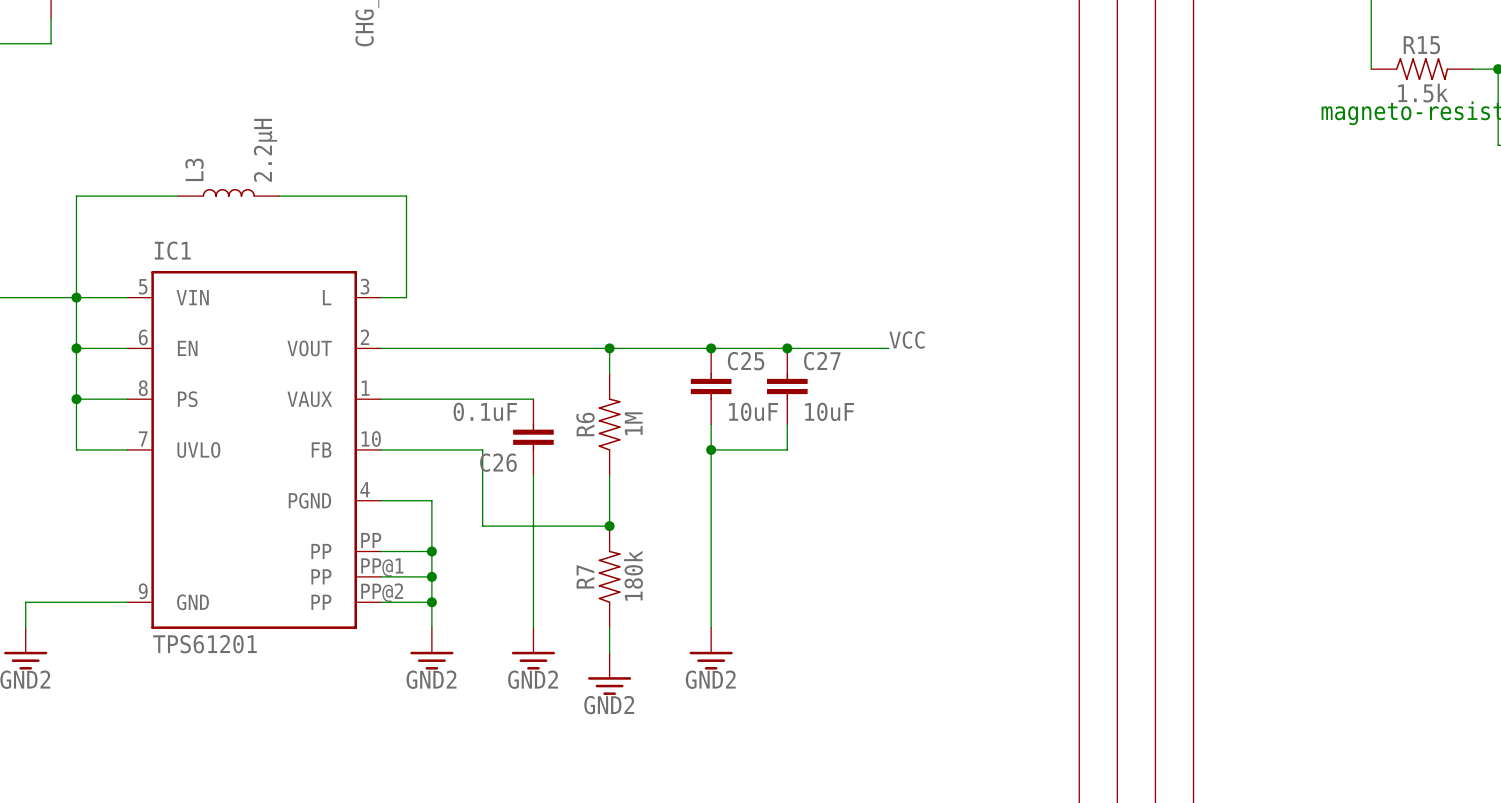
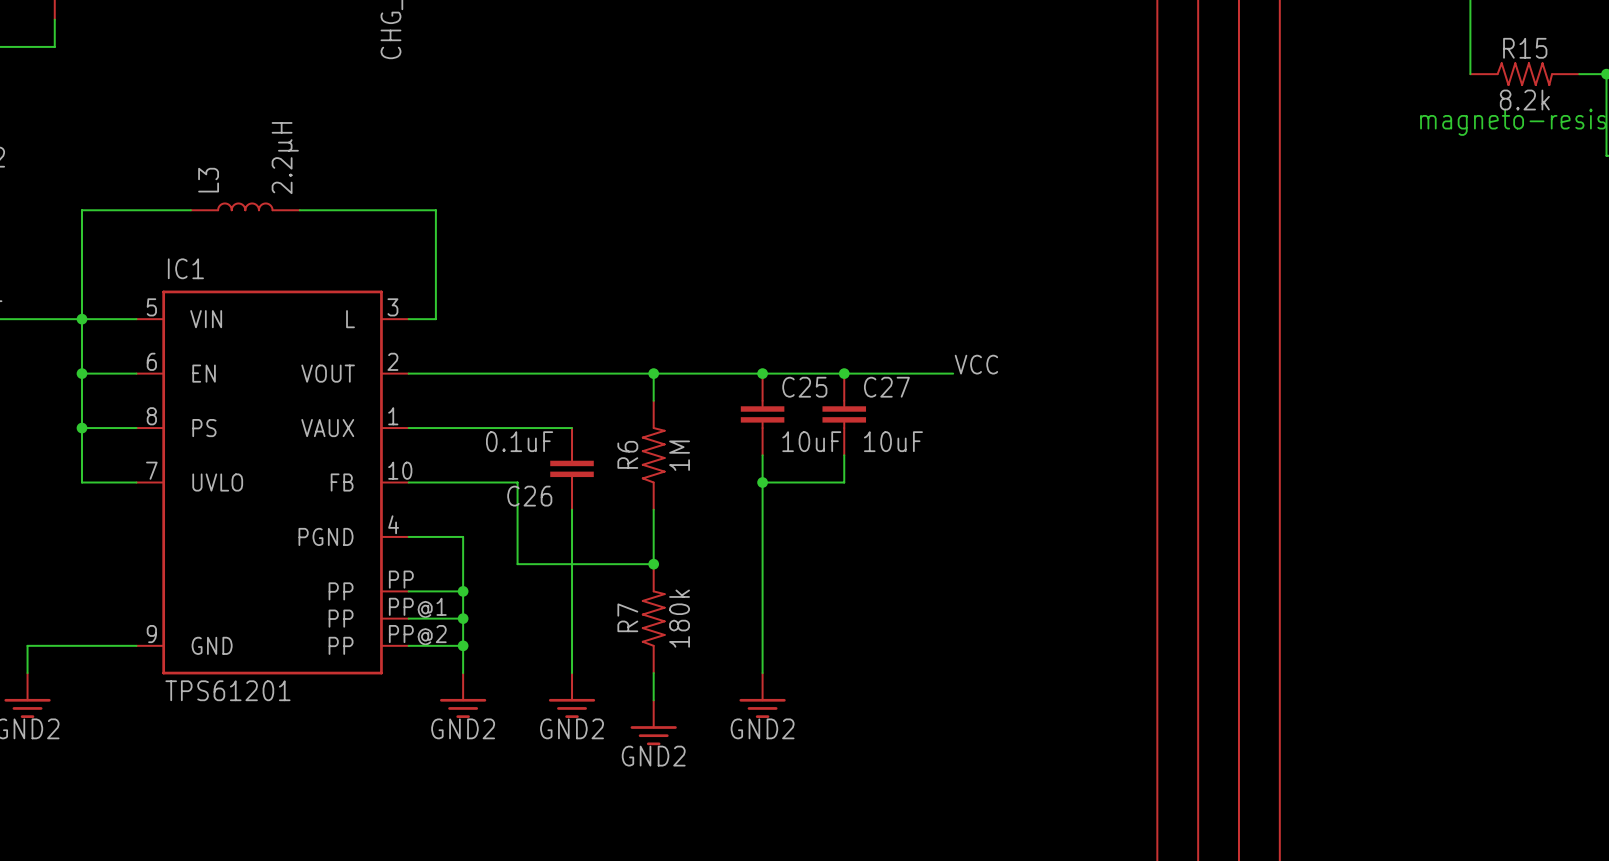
R15 value: 1.5k (1423, 93) -> 8.2k (1524, 100)

